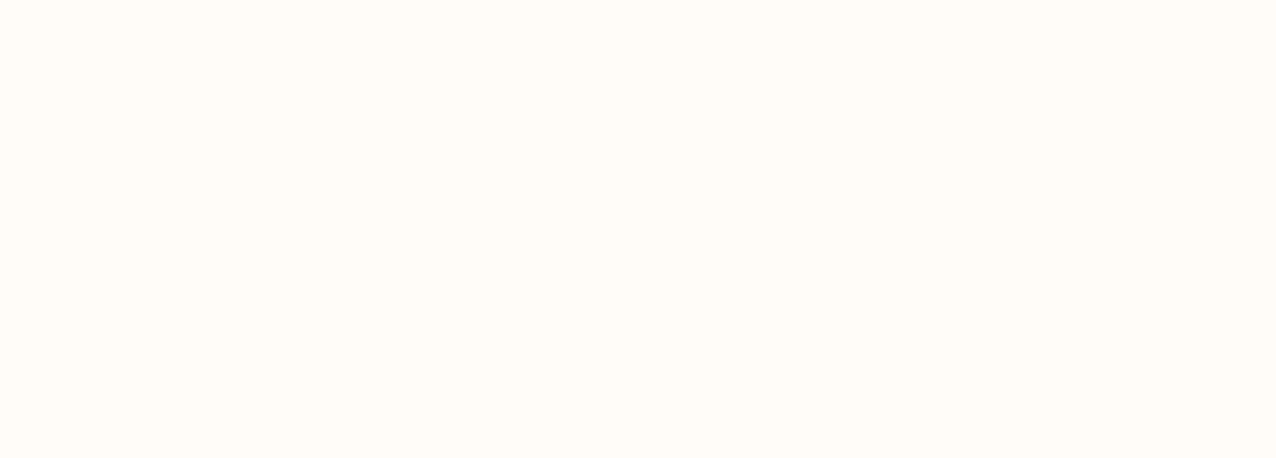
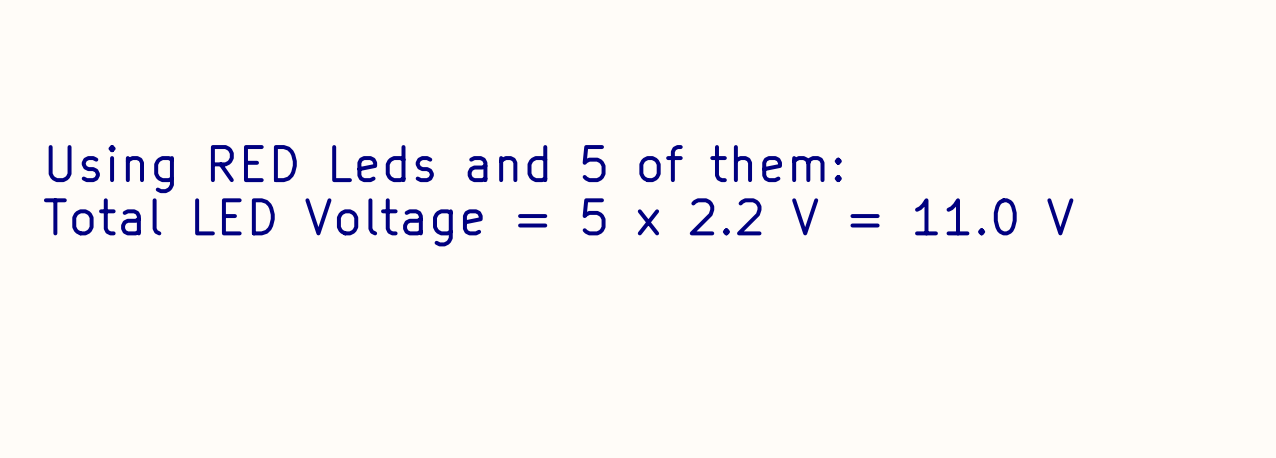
text: none -> Using RED Leds and 5 of them: (445, 169)
text: none -> Total LED Voltage = 5 x 2.2 V = 11.0 V (558, 222)

